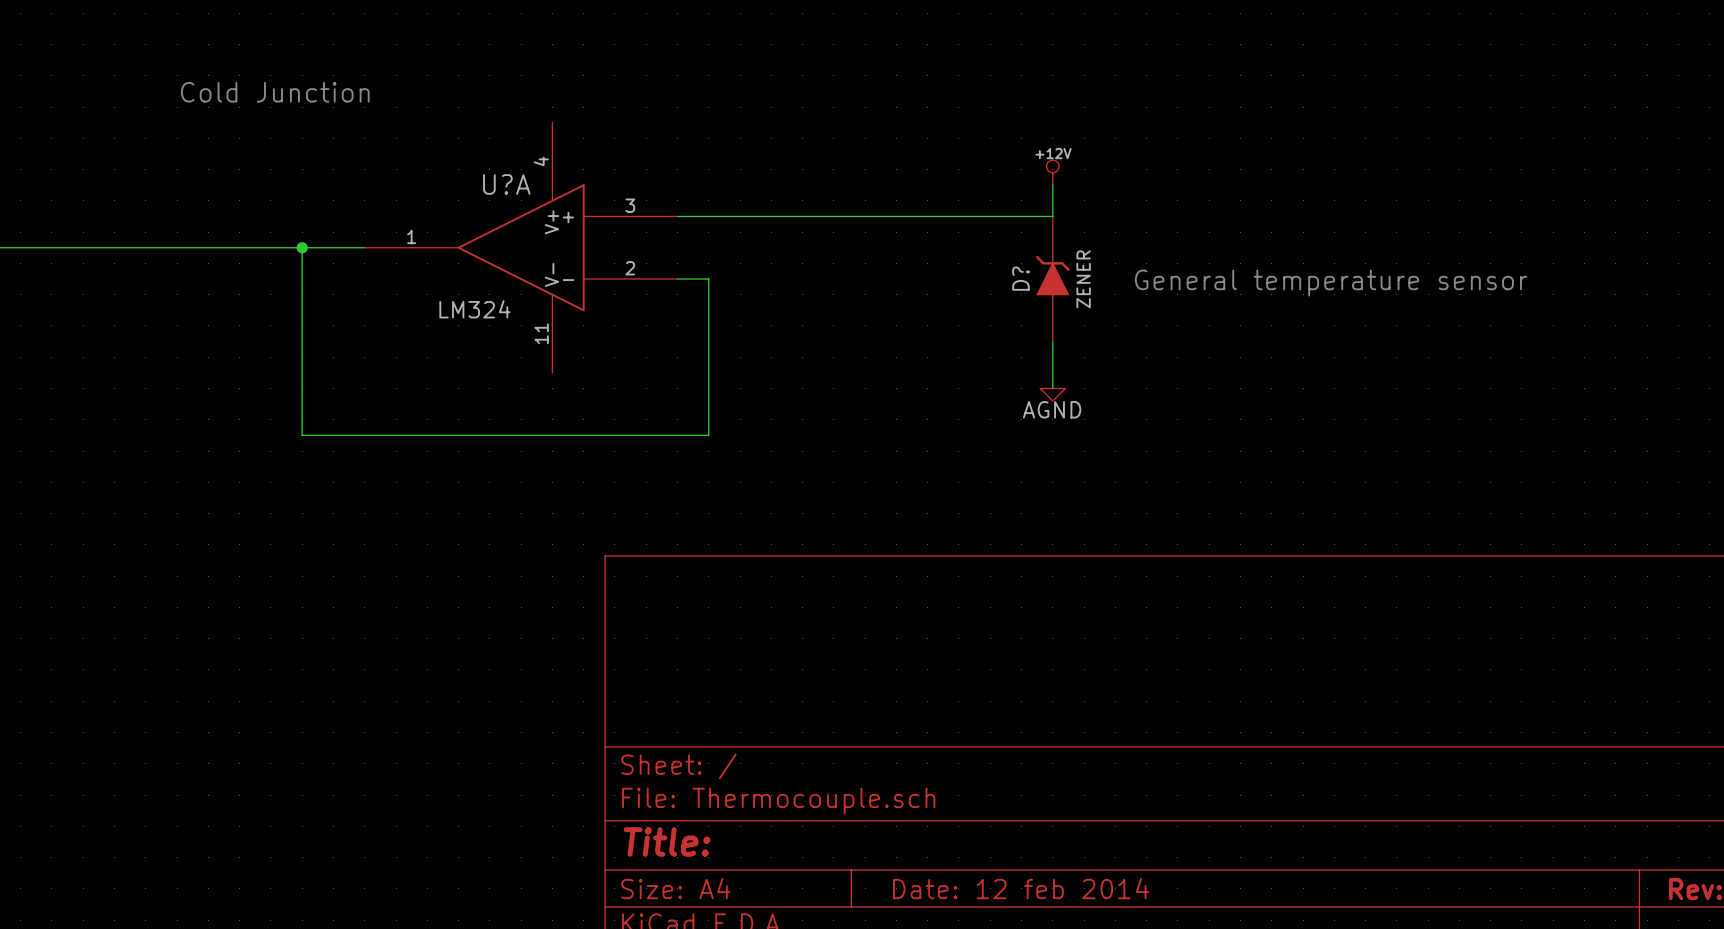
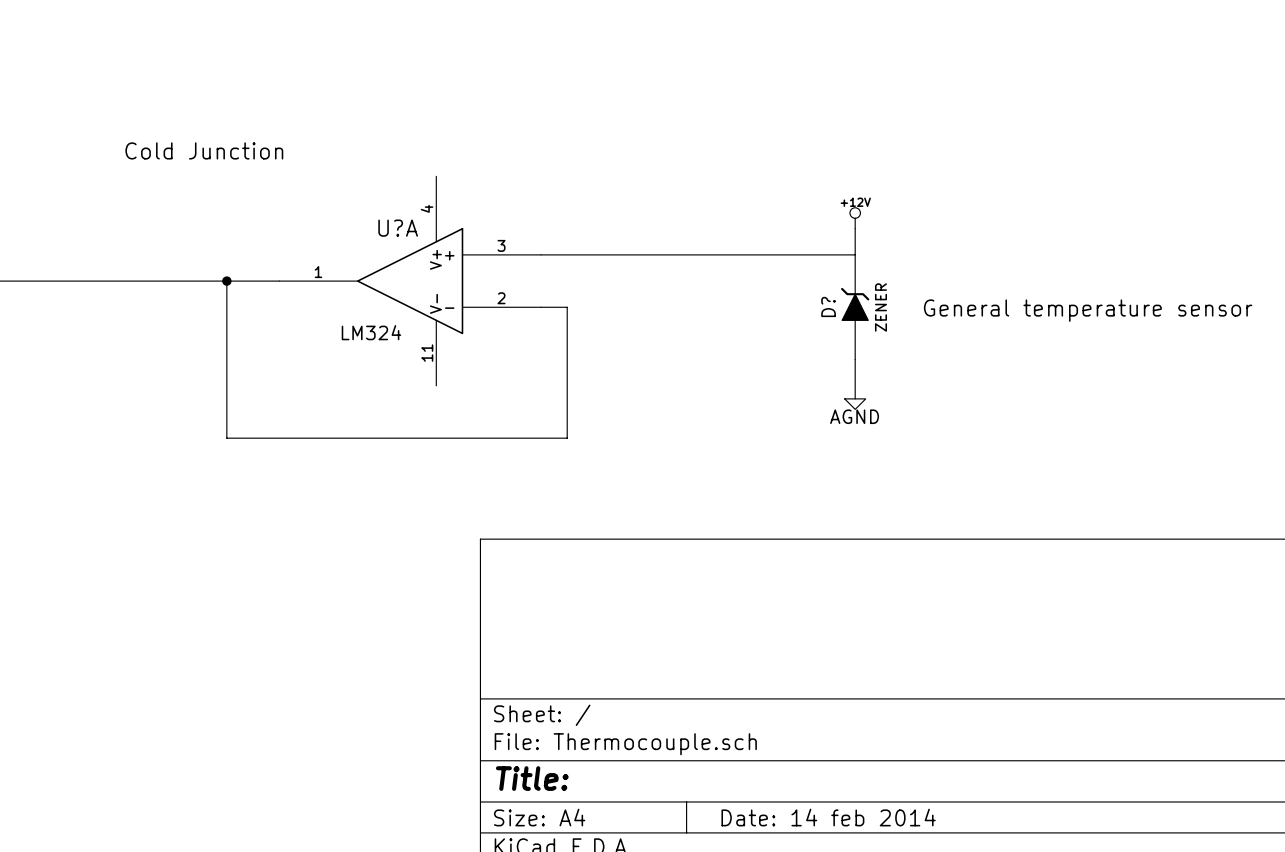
title block: Date: 12 feb 2014 (1021, 888) -> Date: 14 feb 2014 (828, 817)

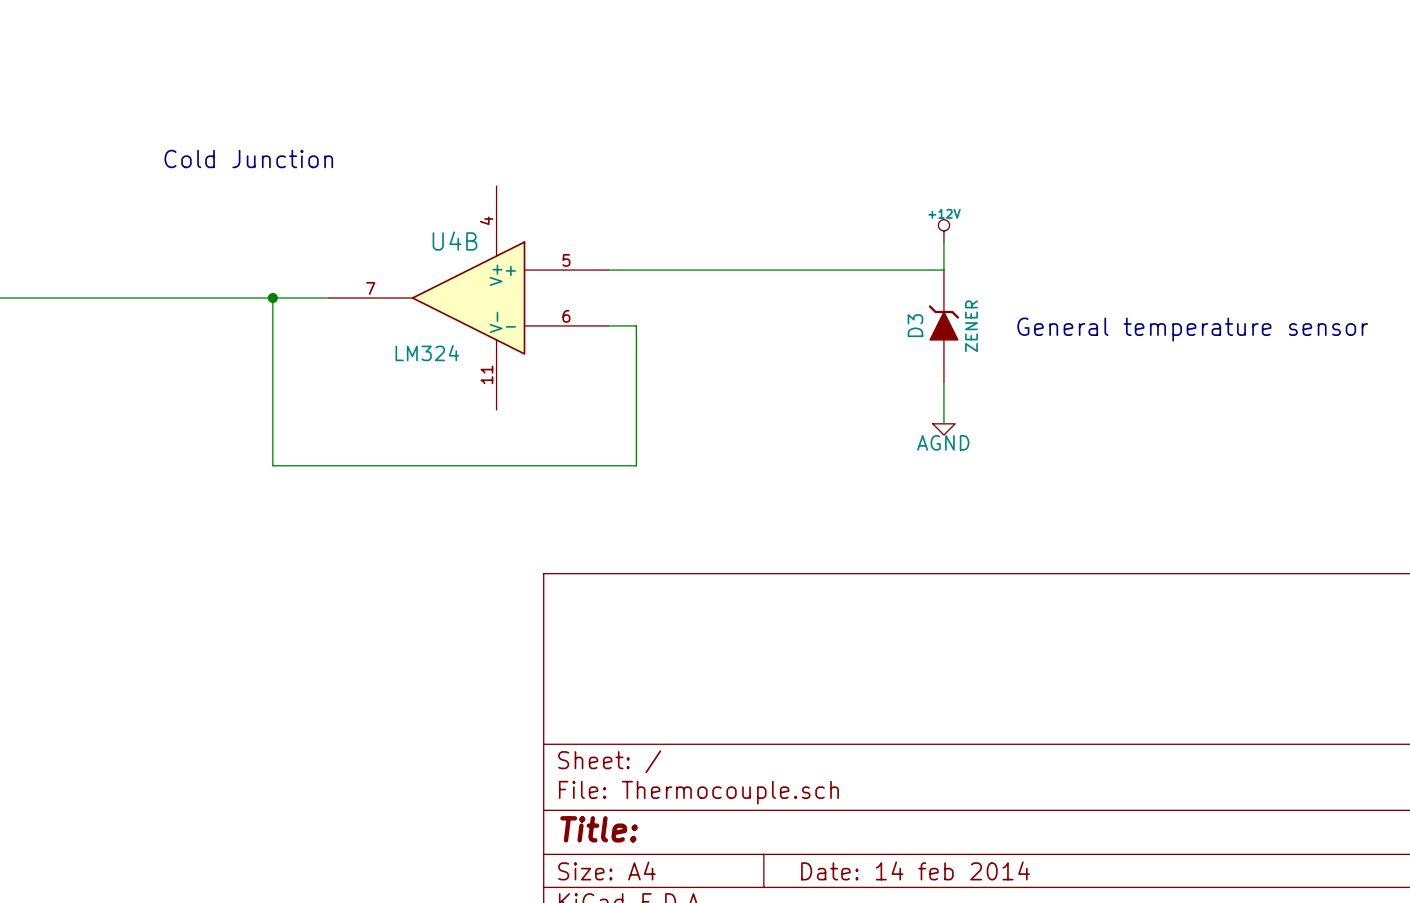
U?A name: U?A (398, 228) -> U4B (455, 241)
U?A pin number: 3 (501, 245) -> 5 (566, 260)
U?A pin number: 1 (318, 272) -> 7 (370, 288)
U?A pin number: 2 (501, 298) -> 6 (566, 316)
D? name: D? (828, 306) -> D3 (915, 325)

